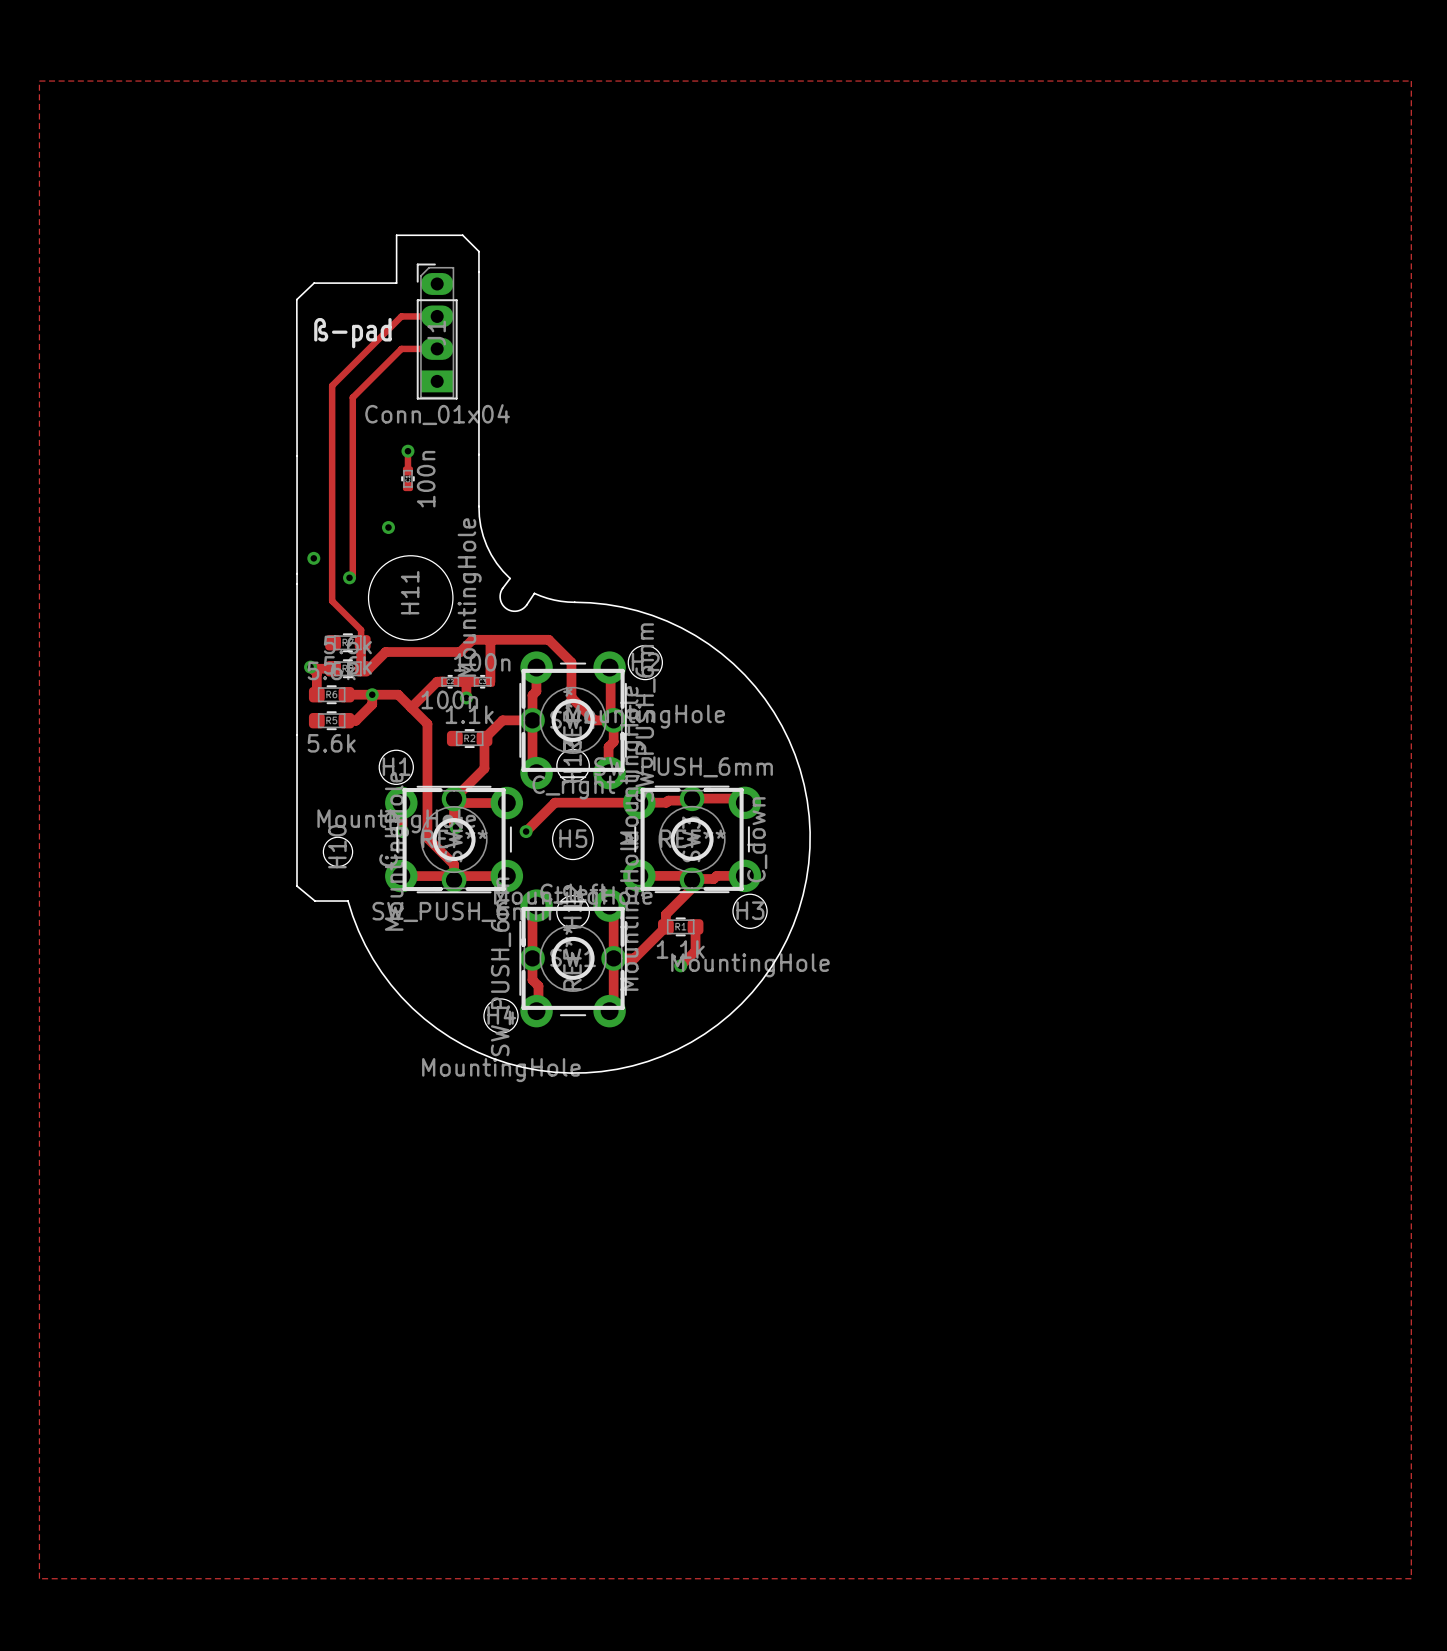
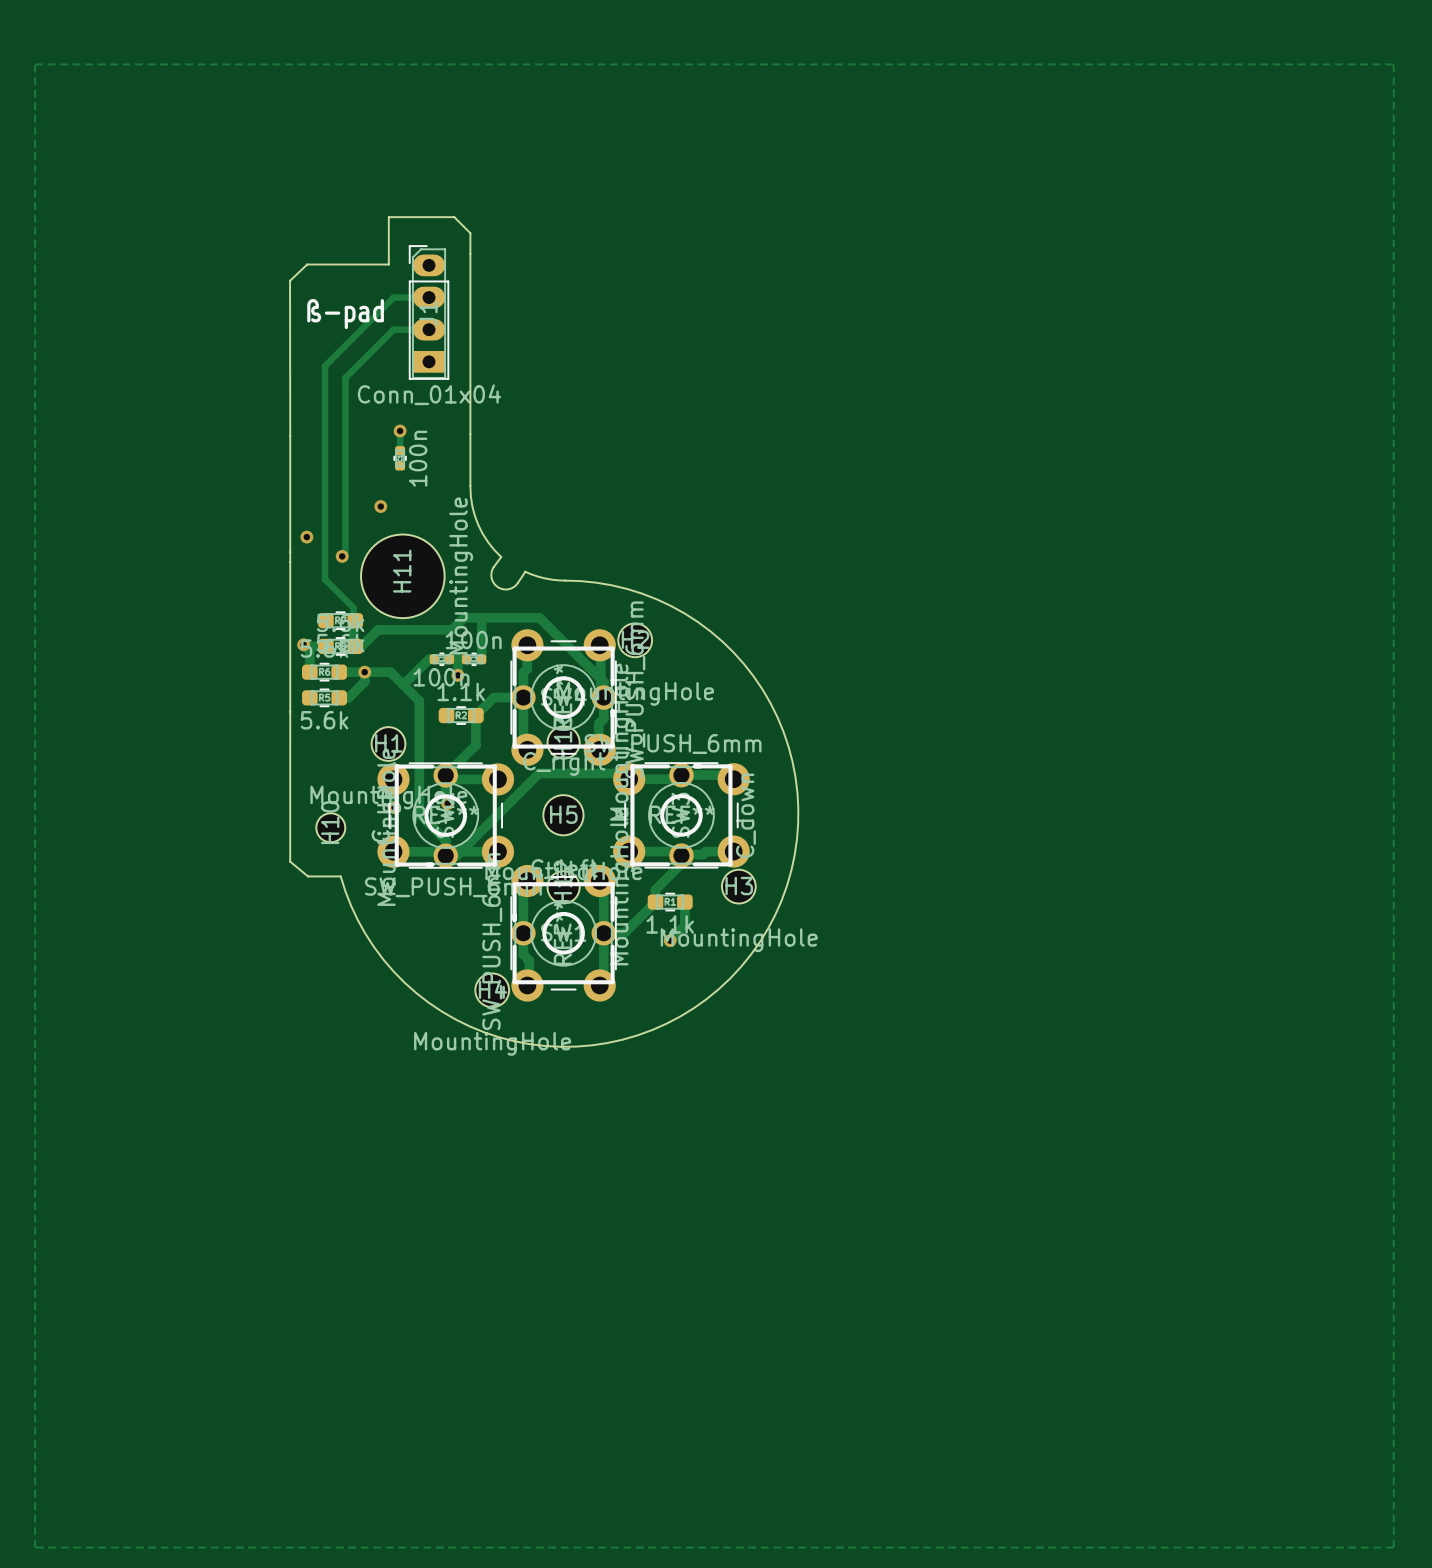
track: (571, 662) (571, 697) (594, 720) (613, 720) -> (562, 640) (603, 682) (603, 697)
track: (690, 800) (668, 800) (666, 802) (554, 802) (526, 831) -> (679, 777) (677, 779) (629, 779) (623, 773) (539, 773) (456, 855) (445, 855)
via: (526, 831) -> none

